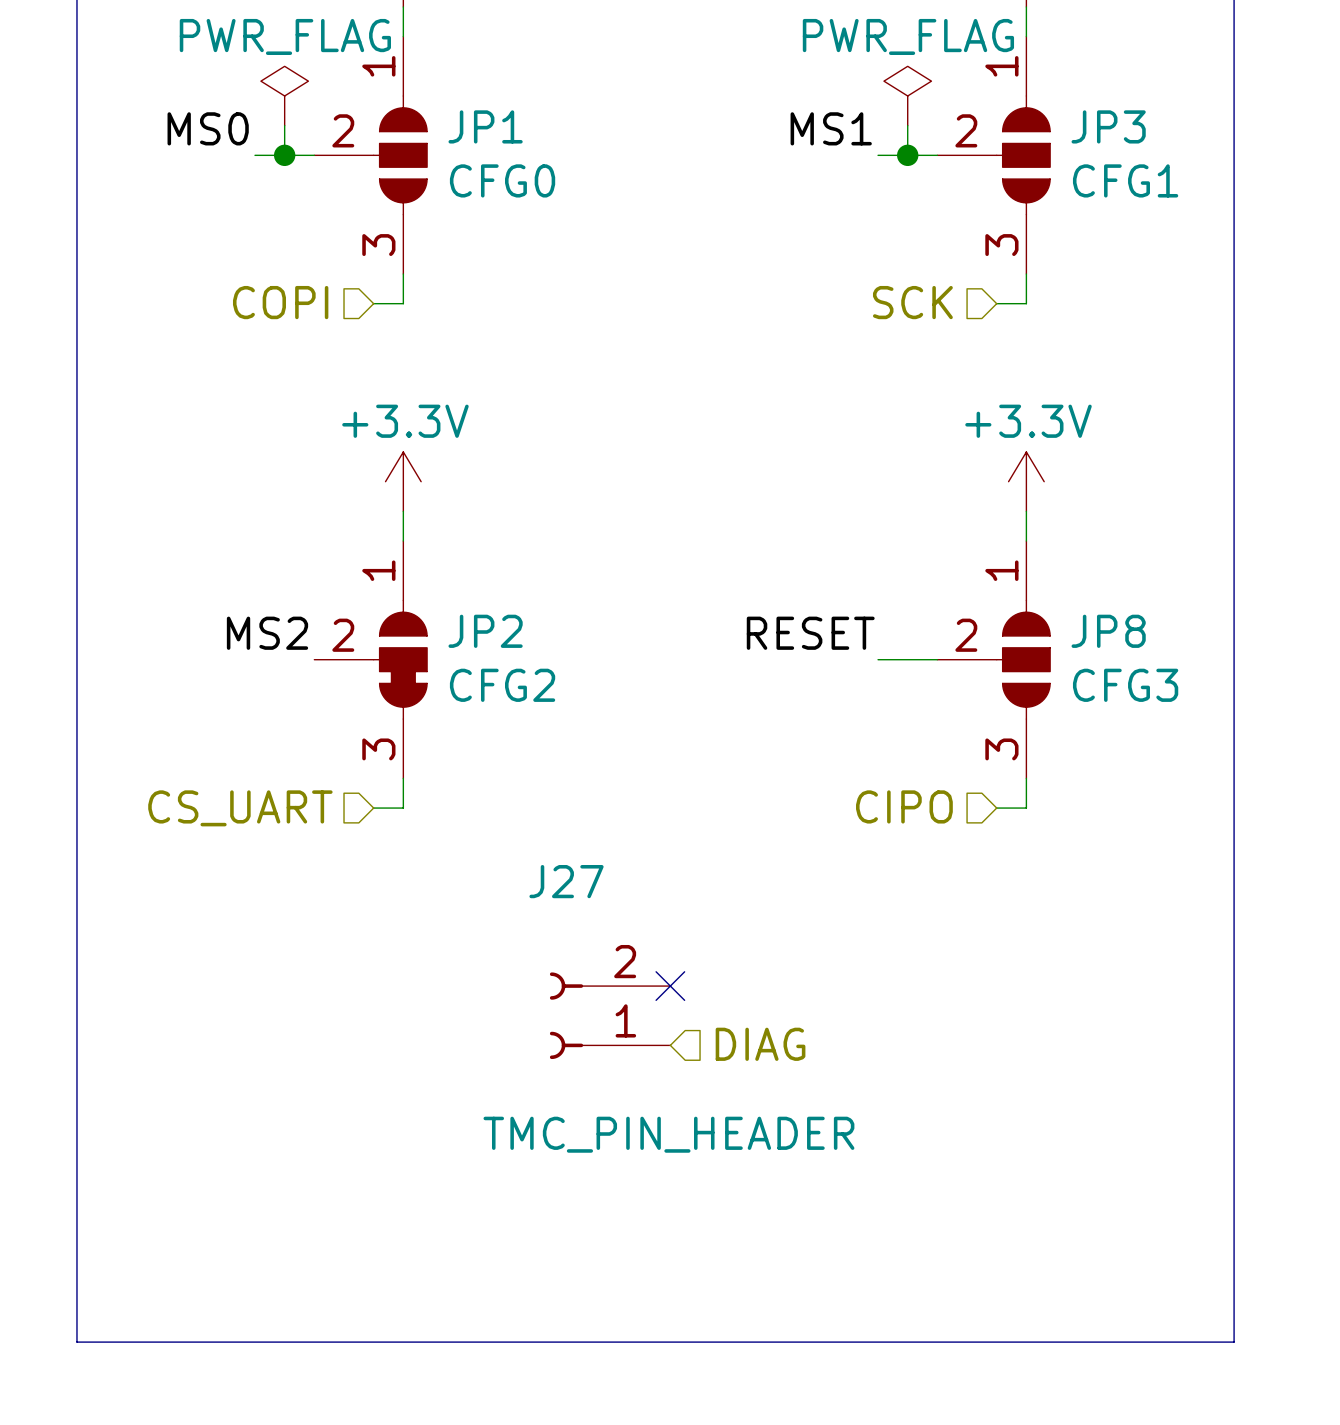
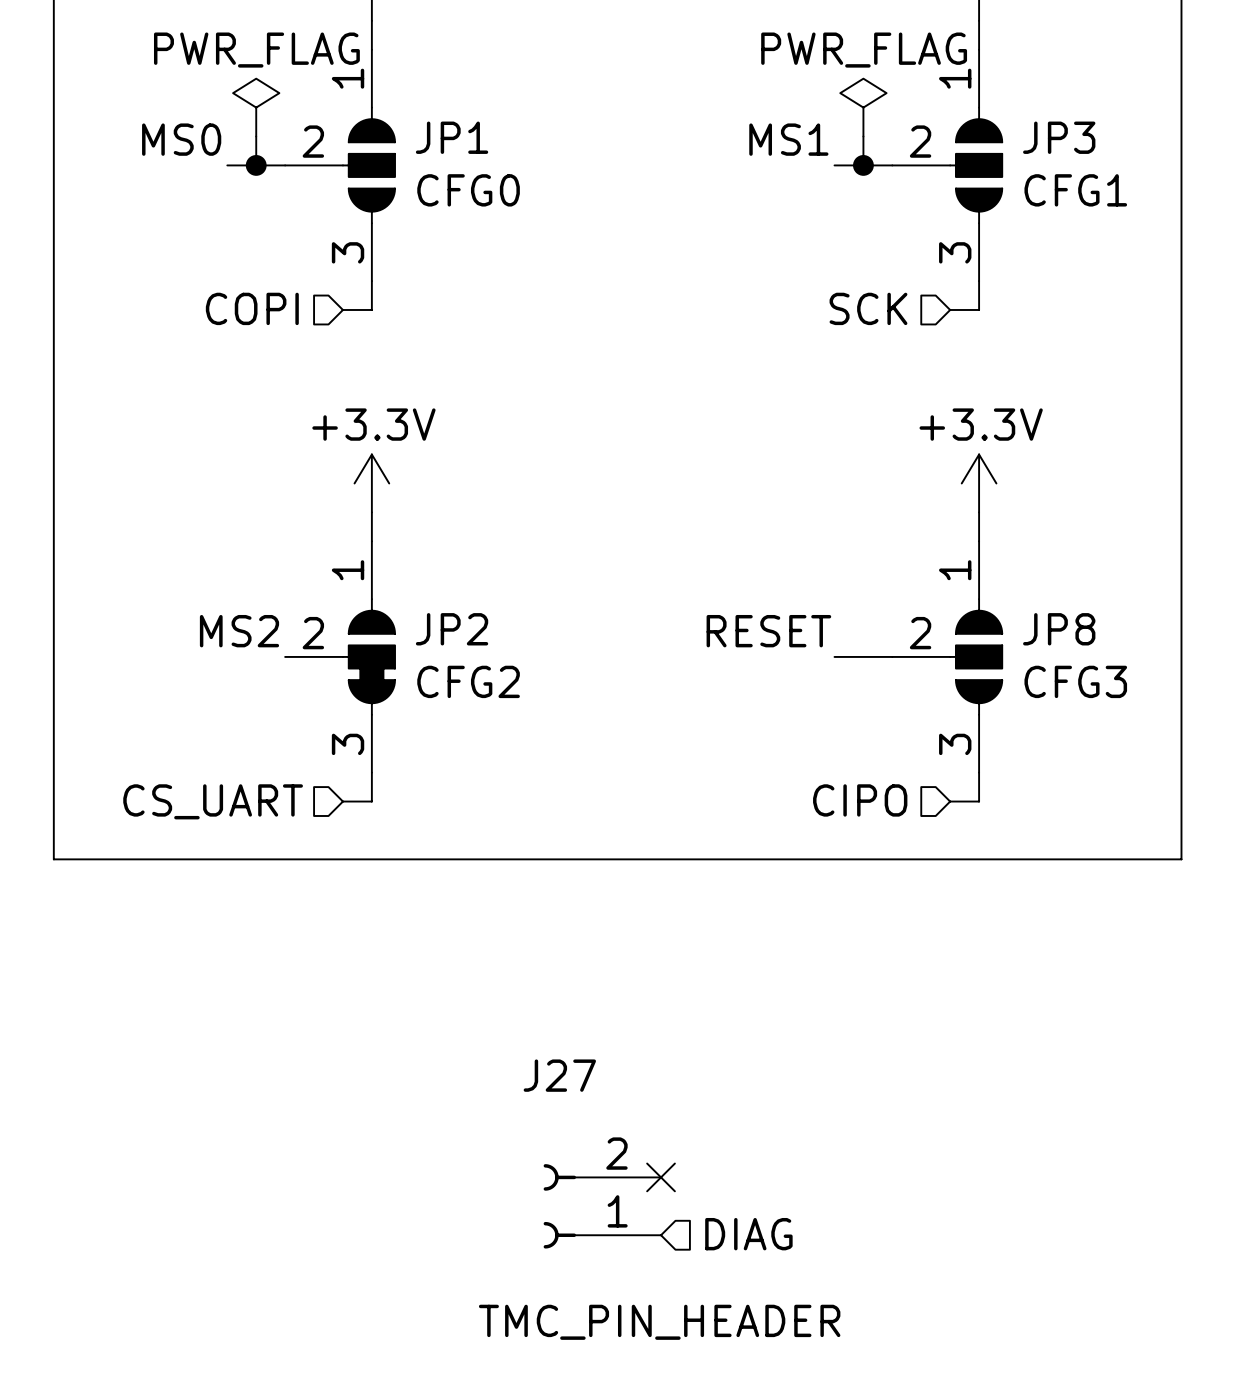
line: (76, 867) (76, 1342) (1234, 1342) (1234, 867) -> (53, 859) (1181, 859)
no-connect mark: (670, 986) -> none
J27 position: (610, 1015) -> (602, 1206)
hierarchical label position: DIAG (760, 1044) -> DIAG (748, 1234)
no-connect mark: none -> (661, 1177)

